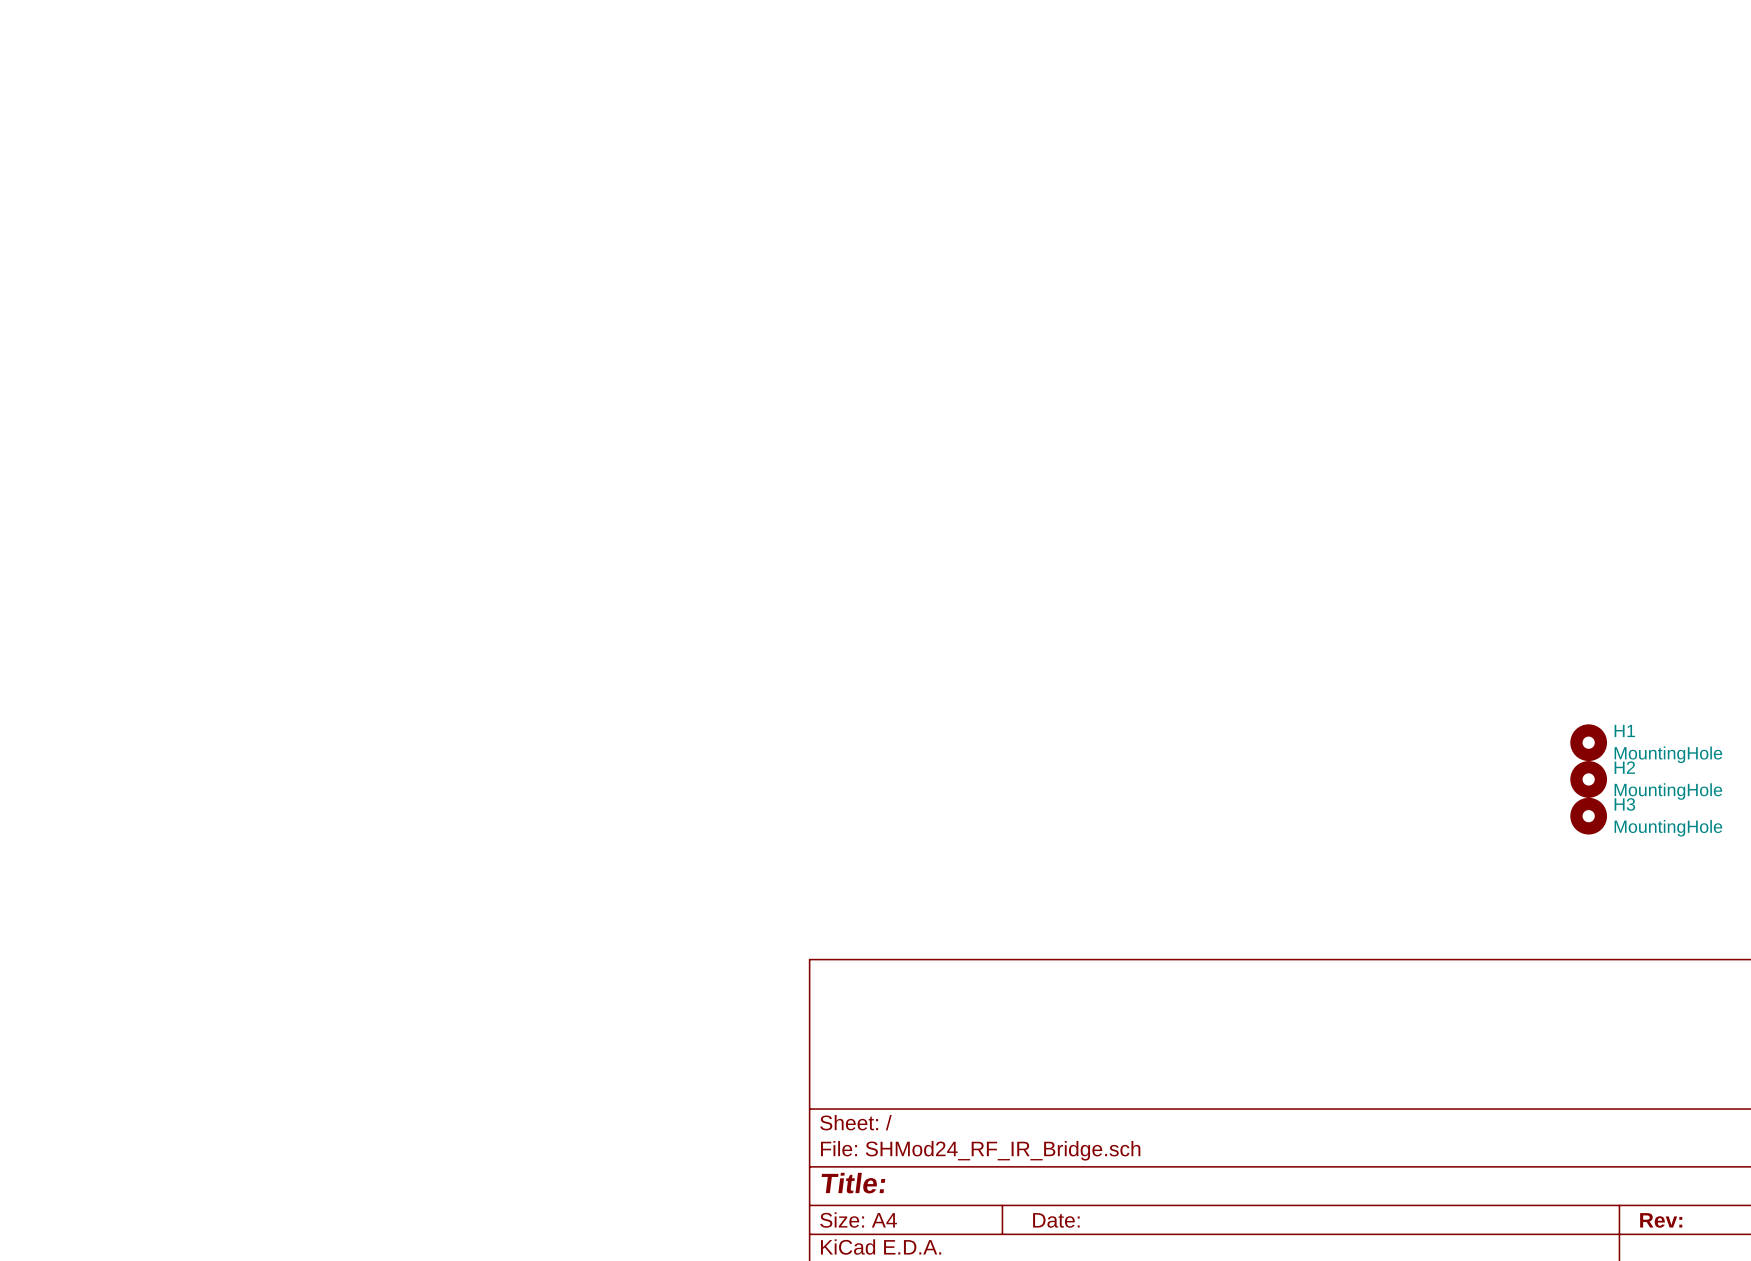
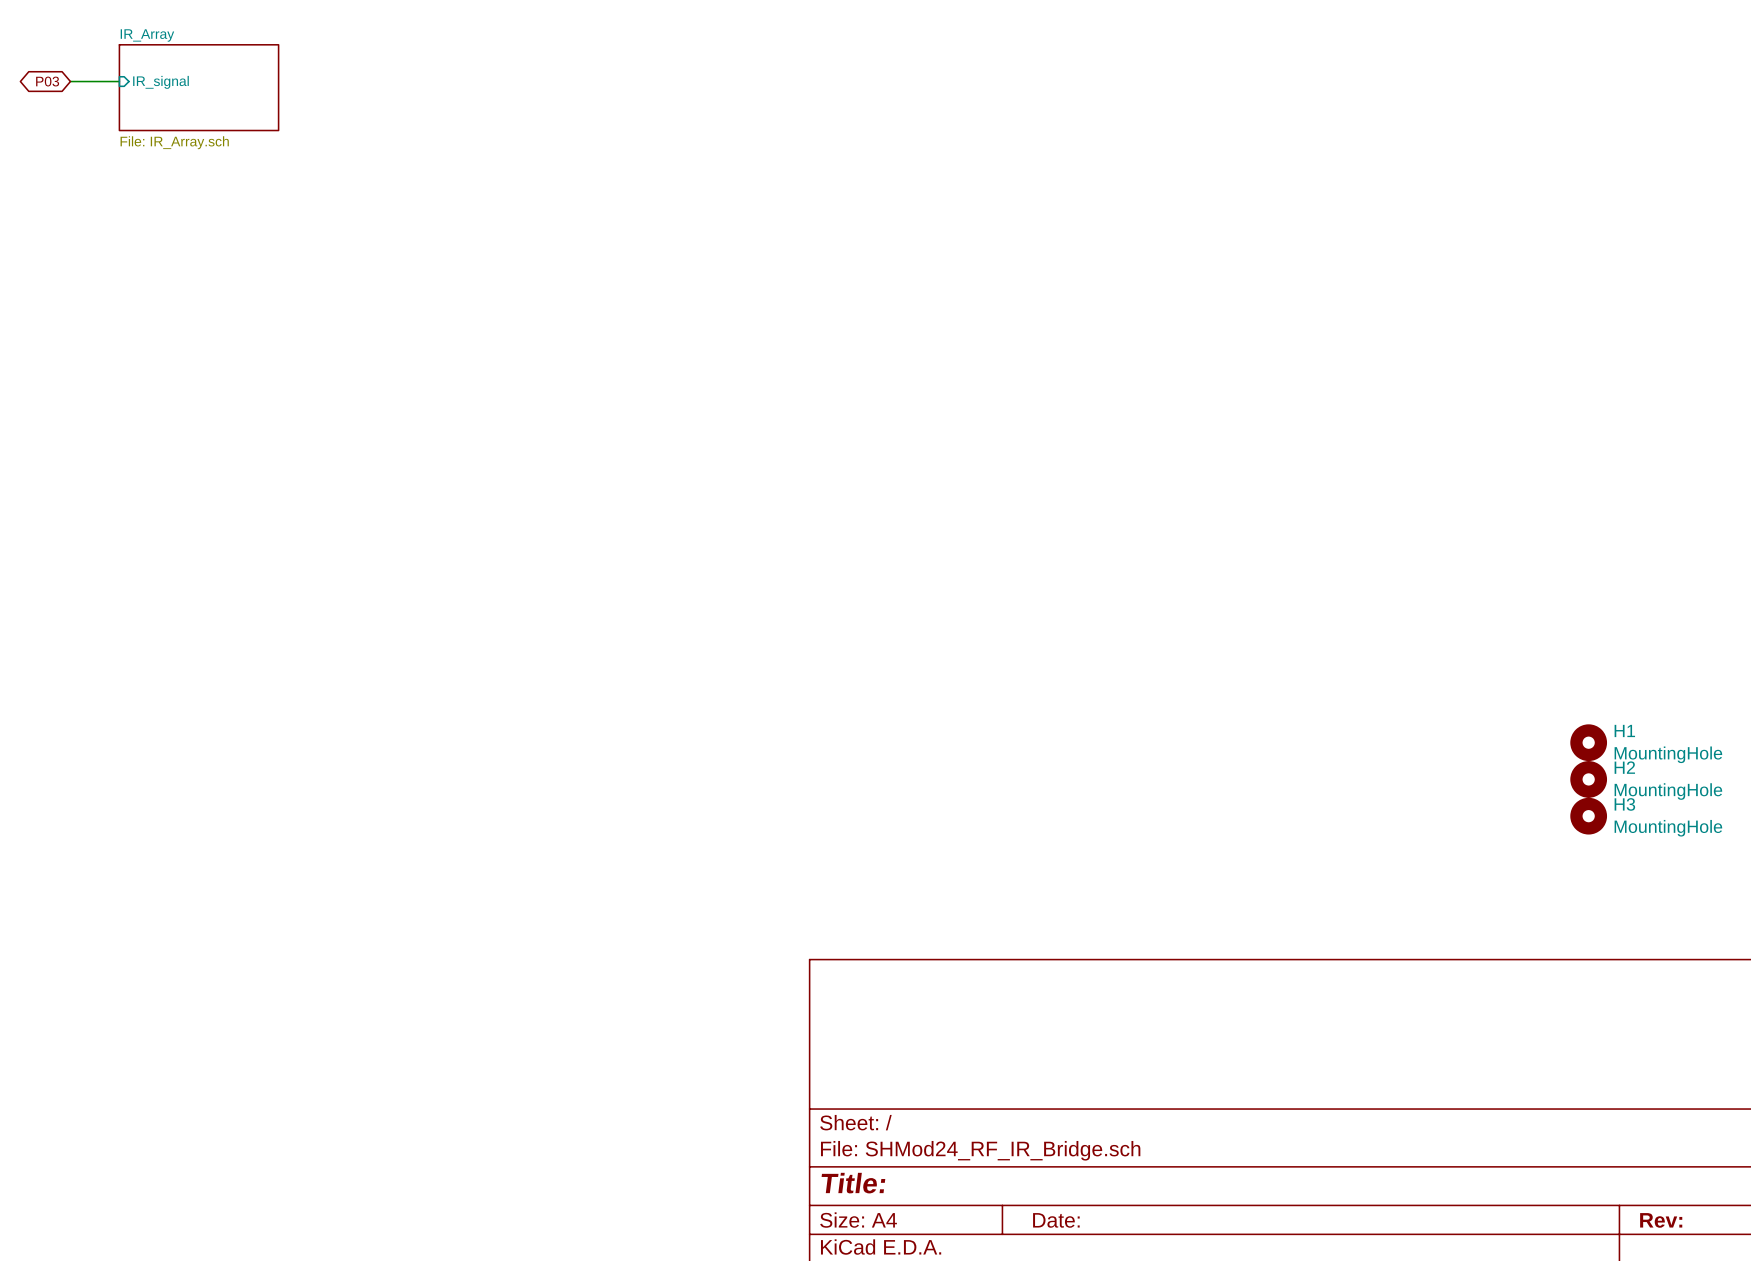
global label: none -> P03 (47, 81)
wire: none -> (70, 81) (119, 81)
sheet pin: none -> IR_signal (160, 82)
sheet IR_Array: none -> File: IR_Array.sch (199, 87)

